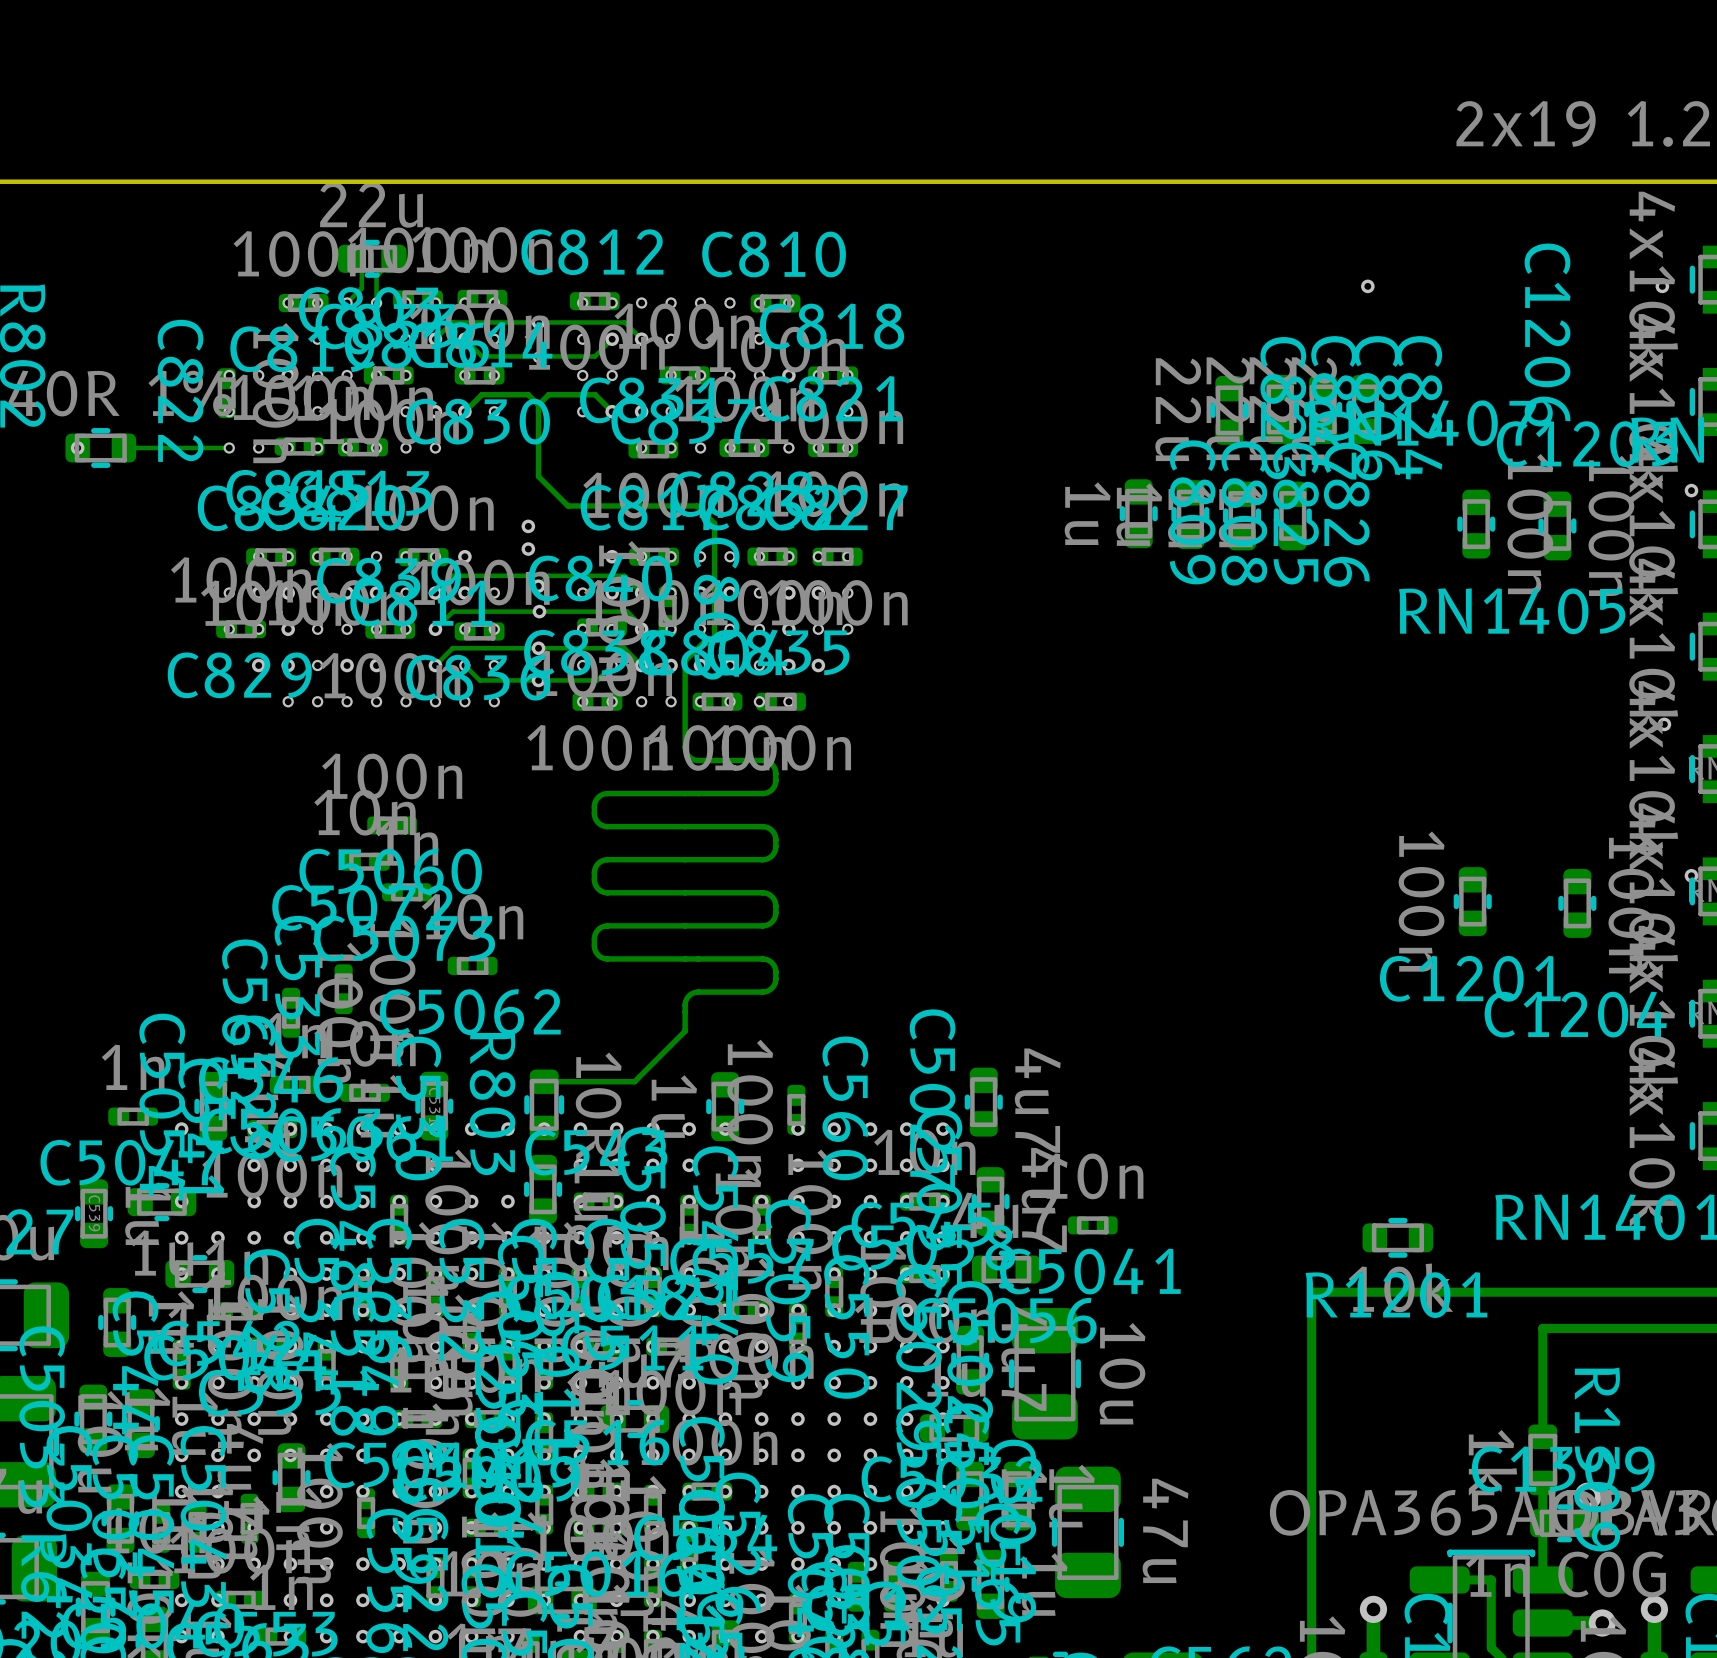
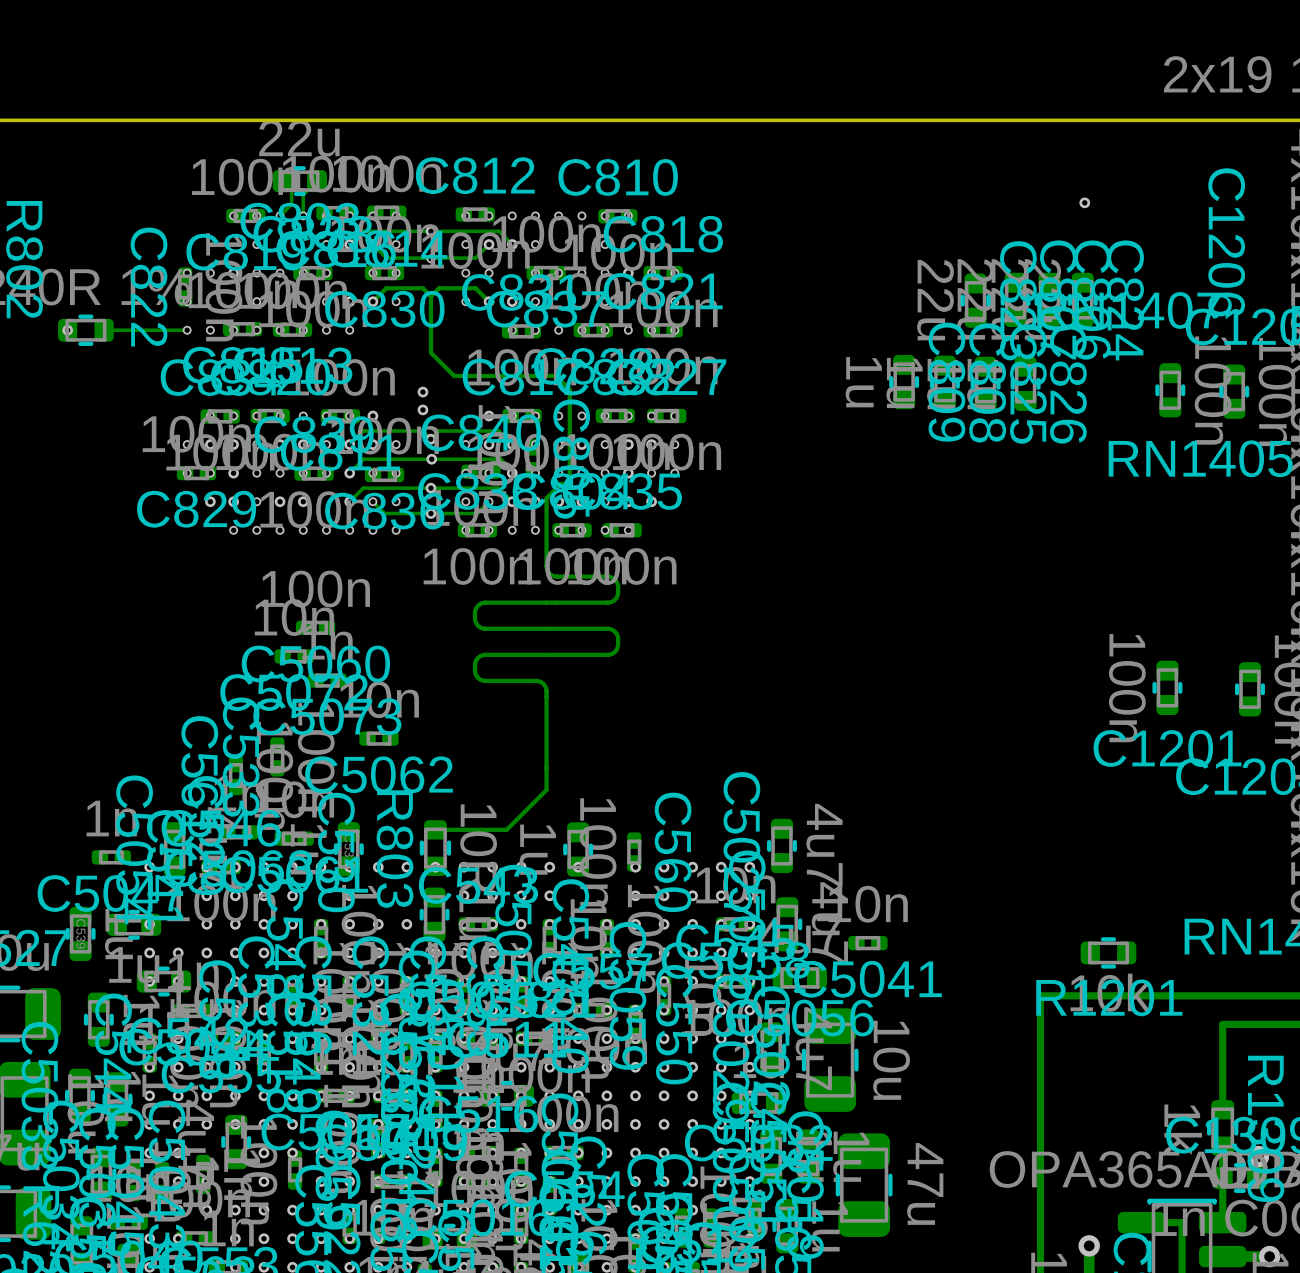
track: (671, 892) (764, 892) (772, 896) (775, 904) (774, 919) (764, 925) (607, 925) (597, 931) (594, 937) (594, 949) (598, 955) (604, 958) (762, 958) (770, 961) (774, 967) (775, 982) (767, 991) (696, 992) (689, 995) (685, 1005) -> (536, 680) (542, 683) (546, 690) (546, 769)

